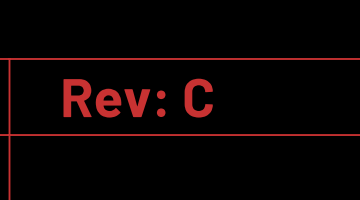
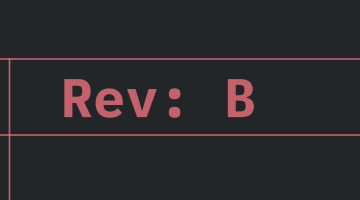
title block: Rev: C (138, 98) -> Rev: B (159, 98)

